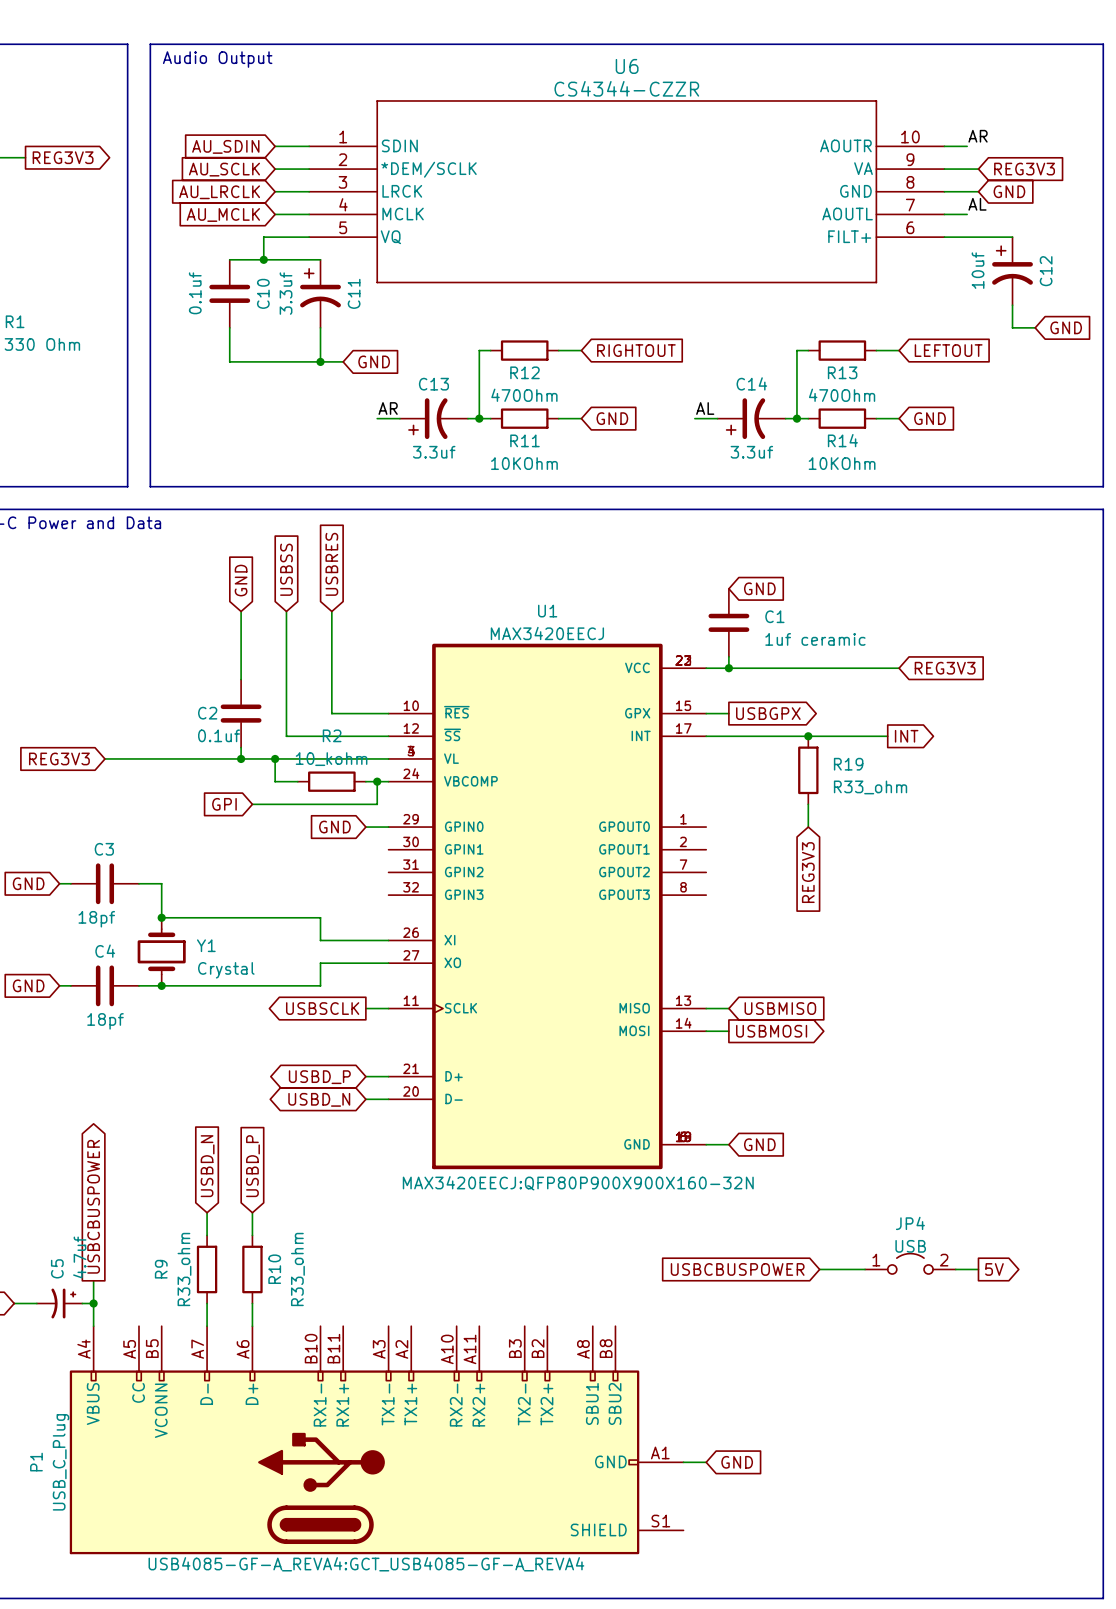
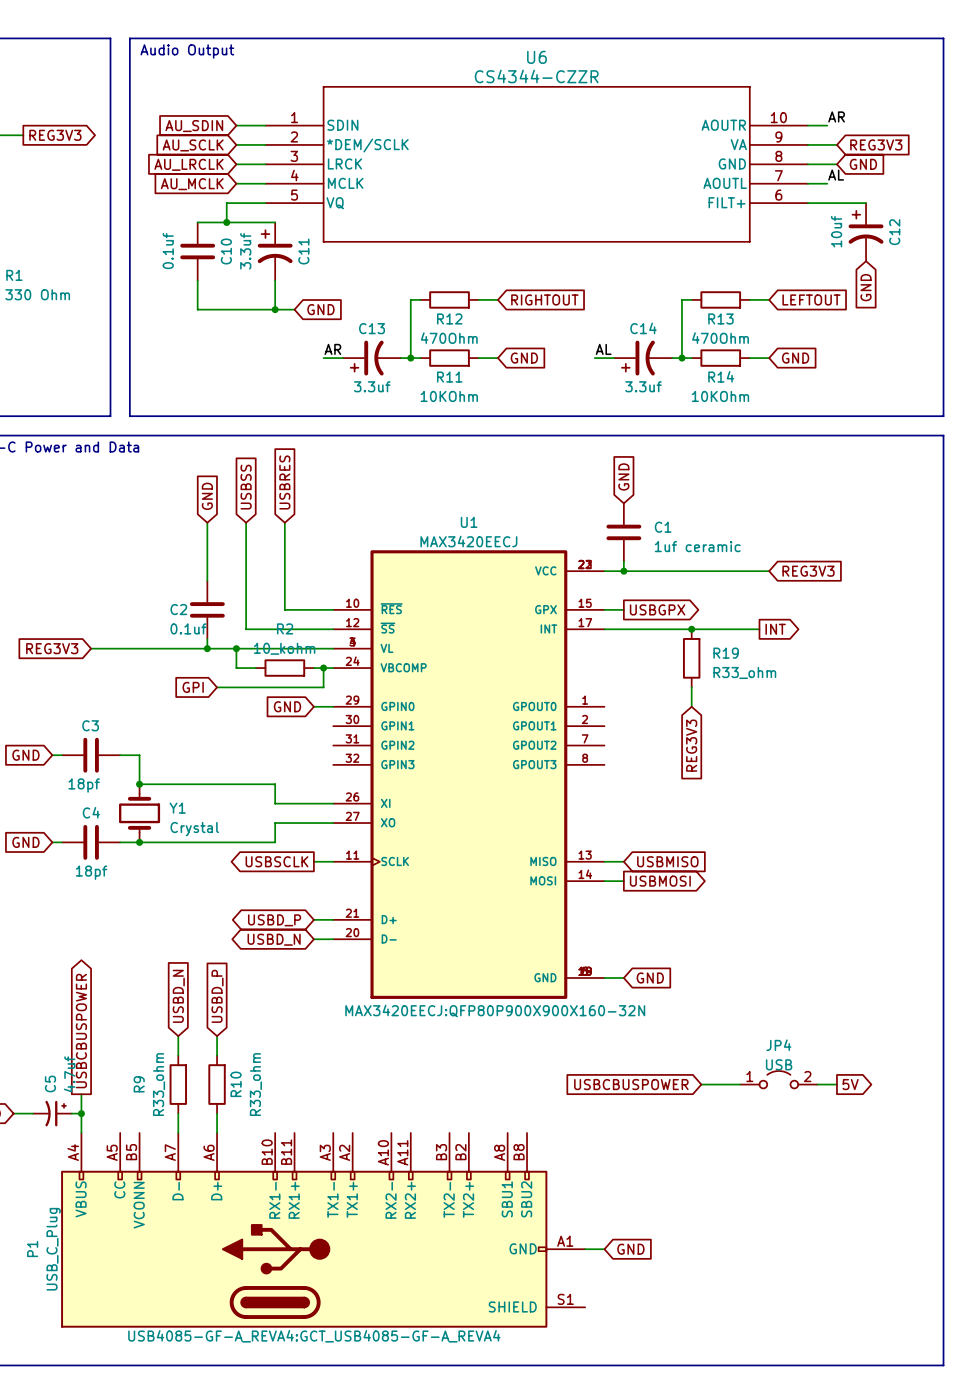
wire: (1012, 305) (1012, 327) (1035, 327) -> none
global label rotation: 0° (1066, 327) -> 90° clockwise (866, 287)
global label rotation: 0° (759, 588) -> 90° counterclockwise (623, 476)

